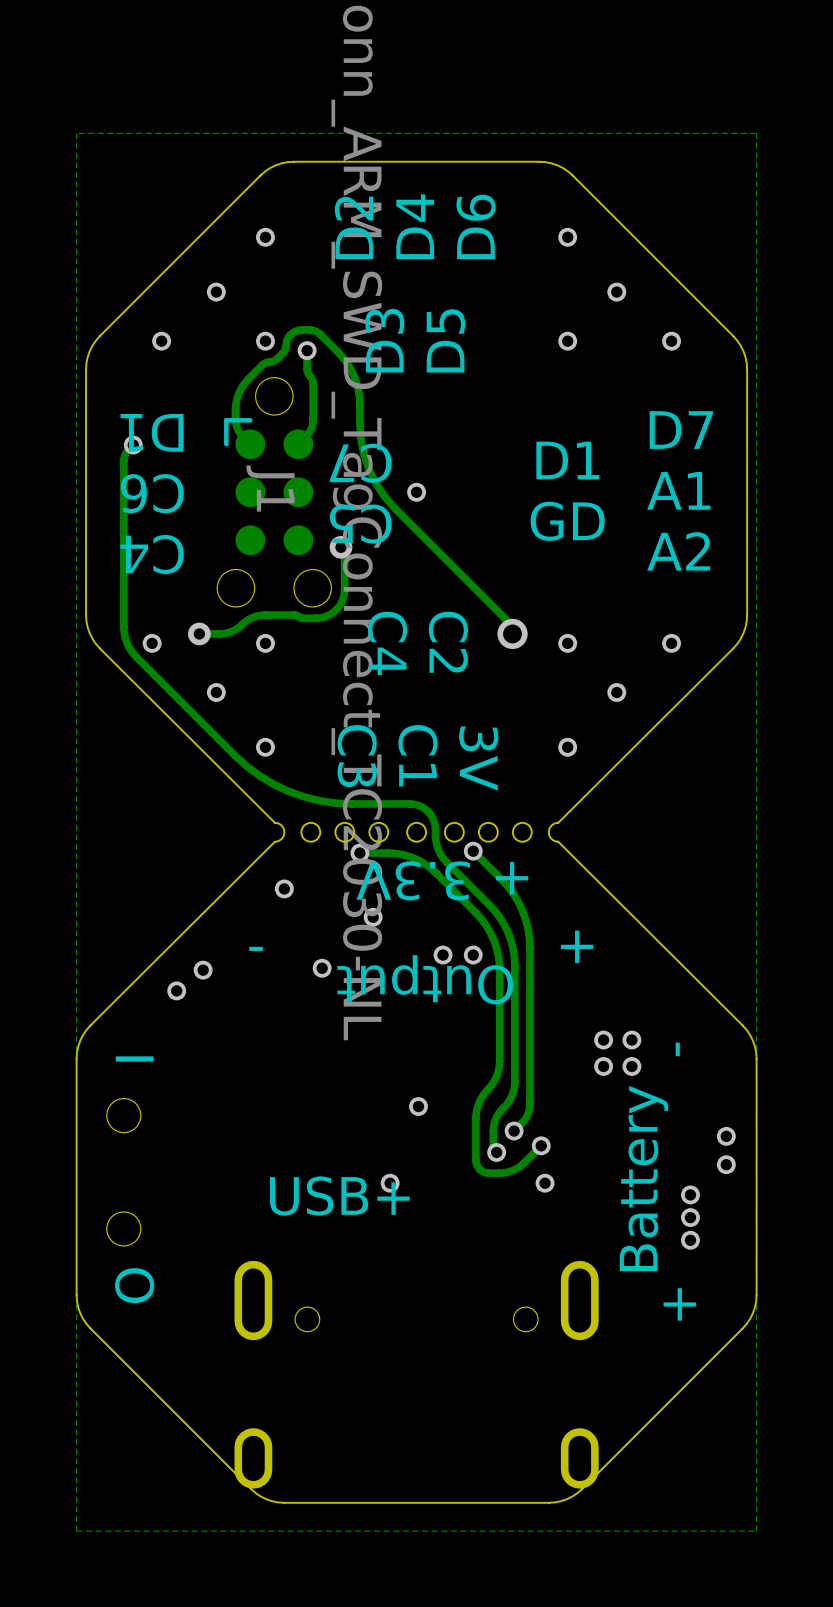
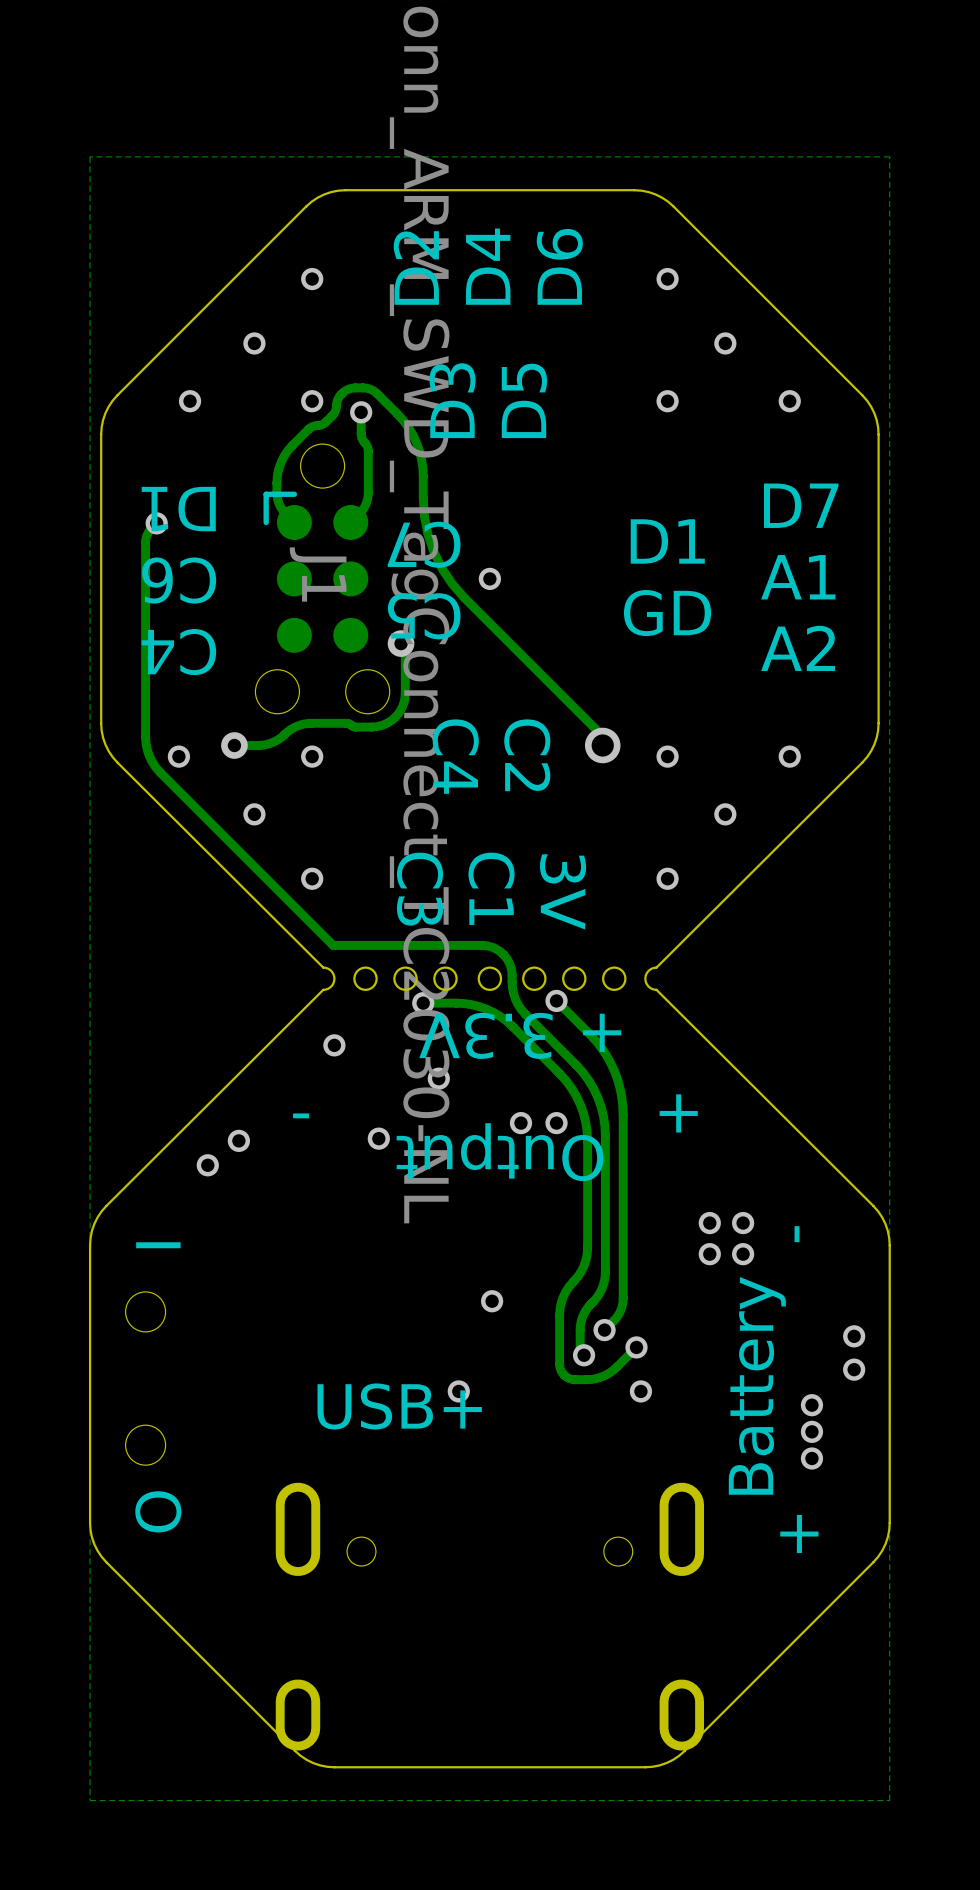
track: (234, 755) (259, 776) (288, 791) (319, 800) (351, 803) -> (276, 888) (333, 945) (413, 945)

